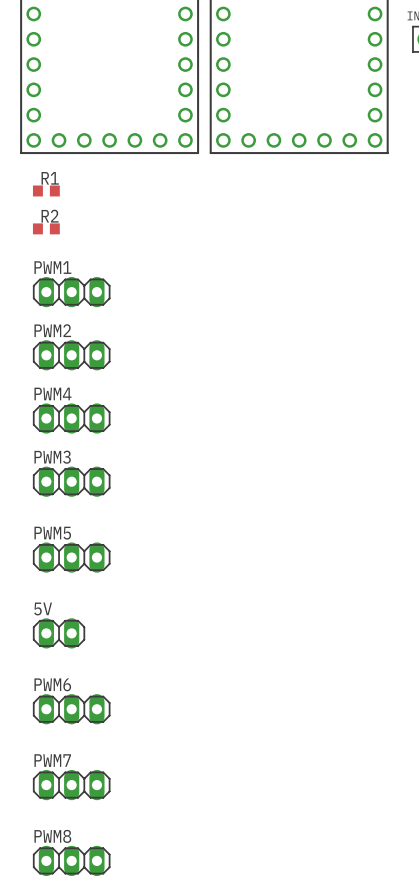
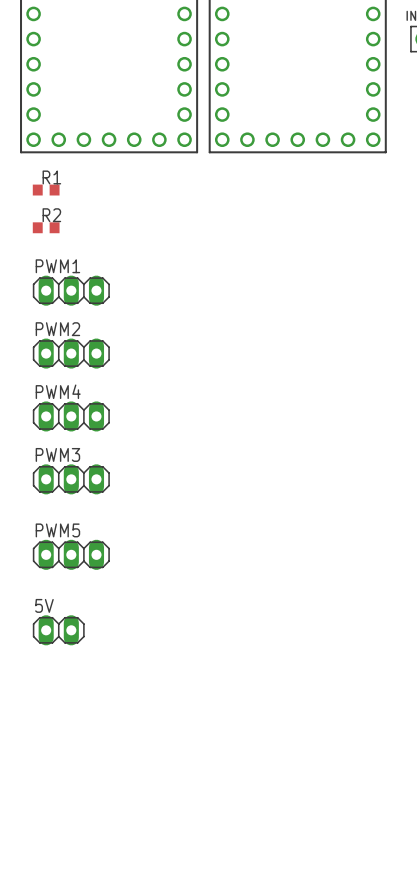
PWM6: (71, 709) -> none
PWM7: (71, 785) -> none
PWM8: (71, 860) -> none

